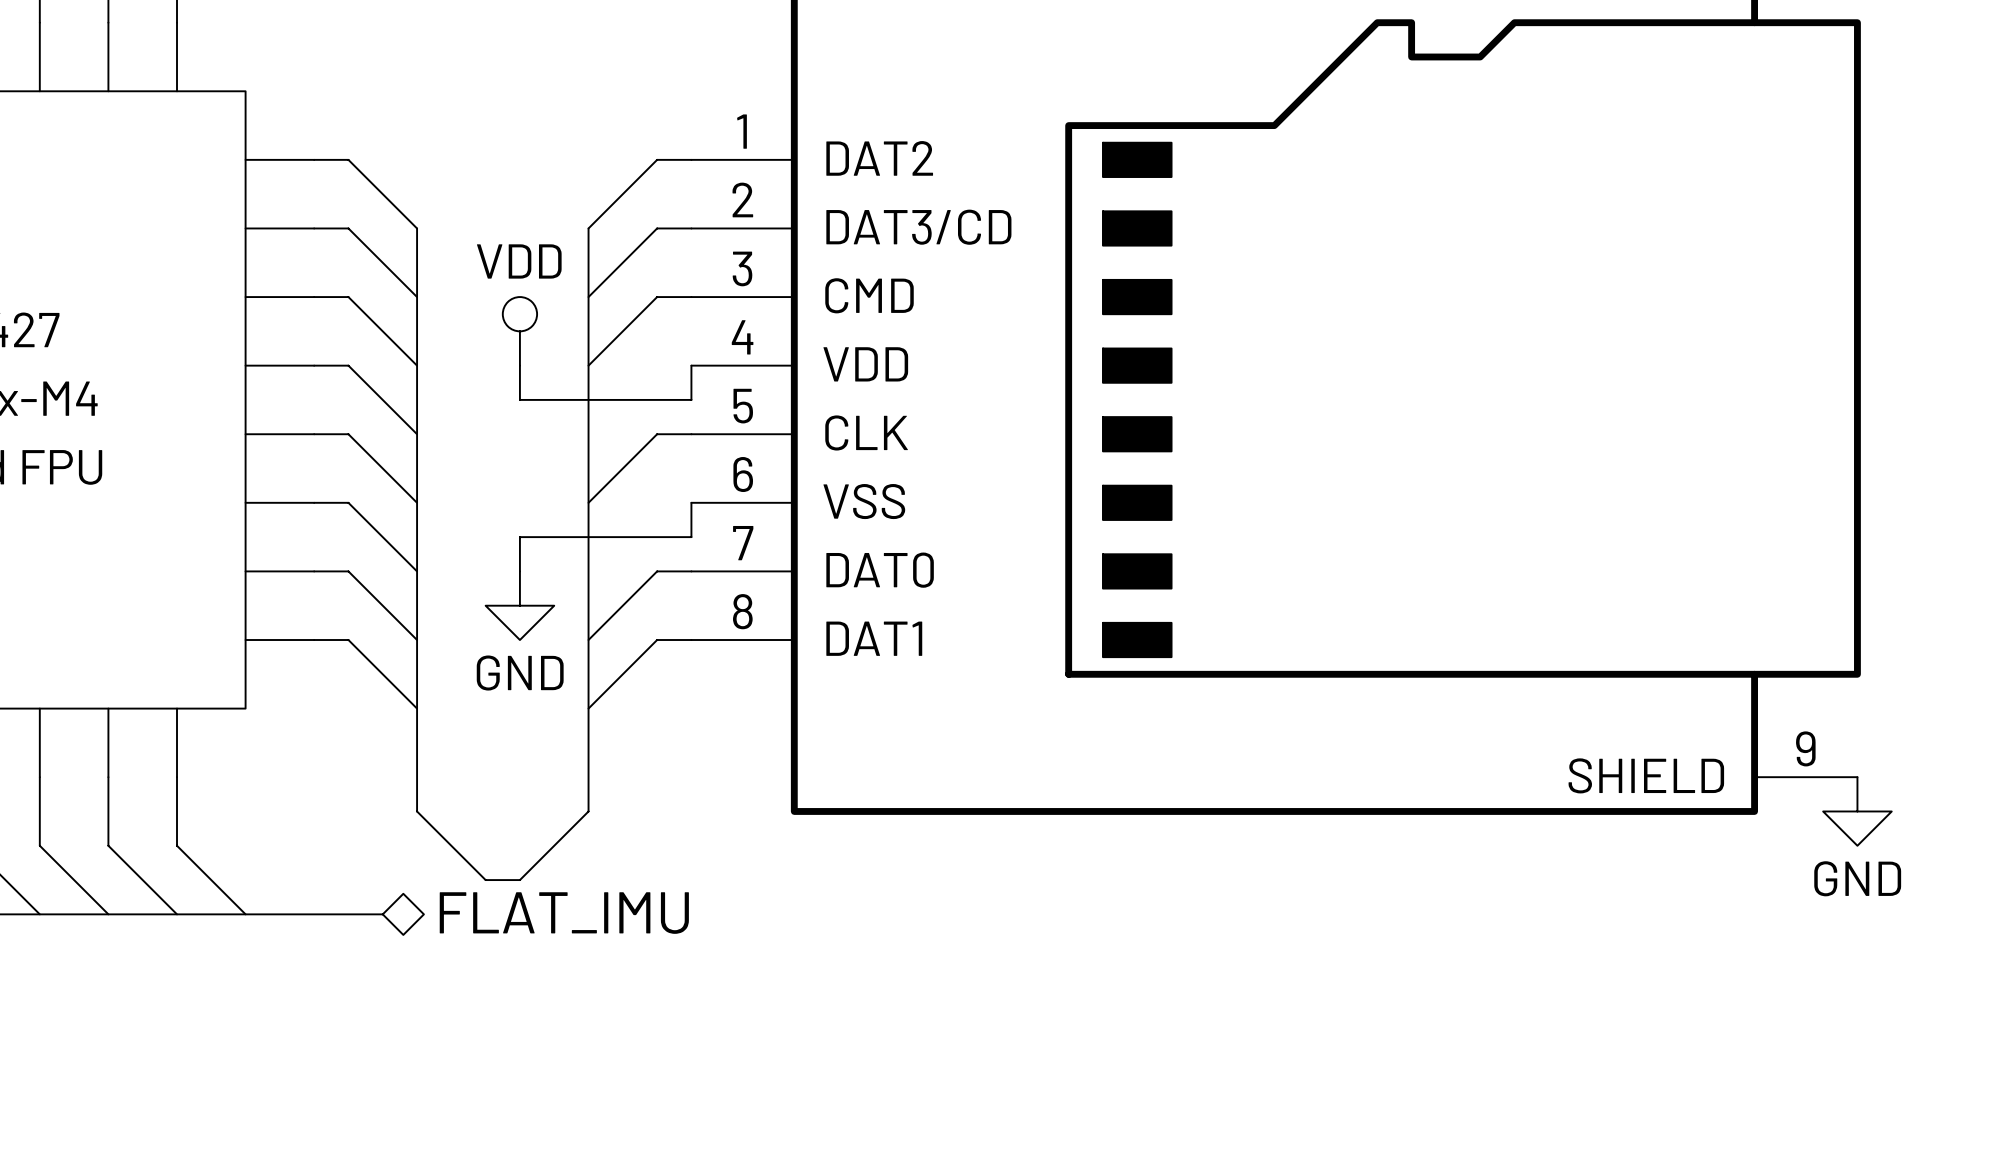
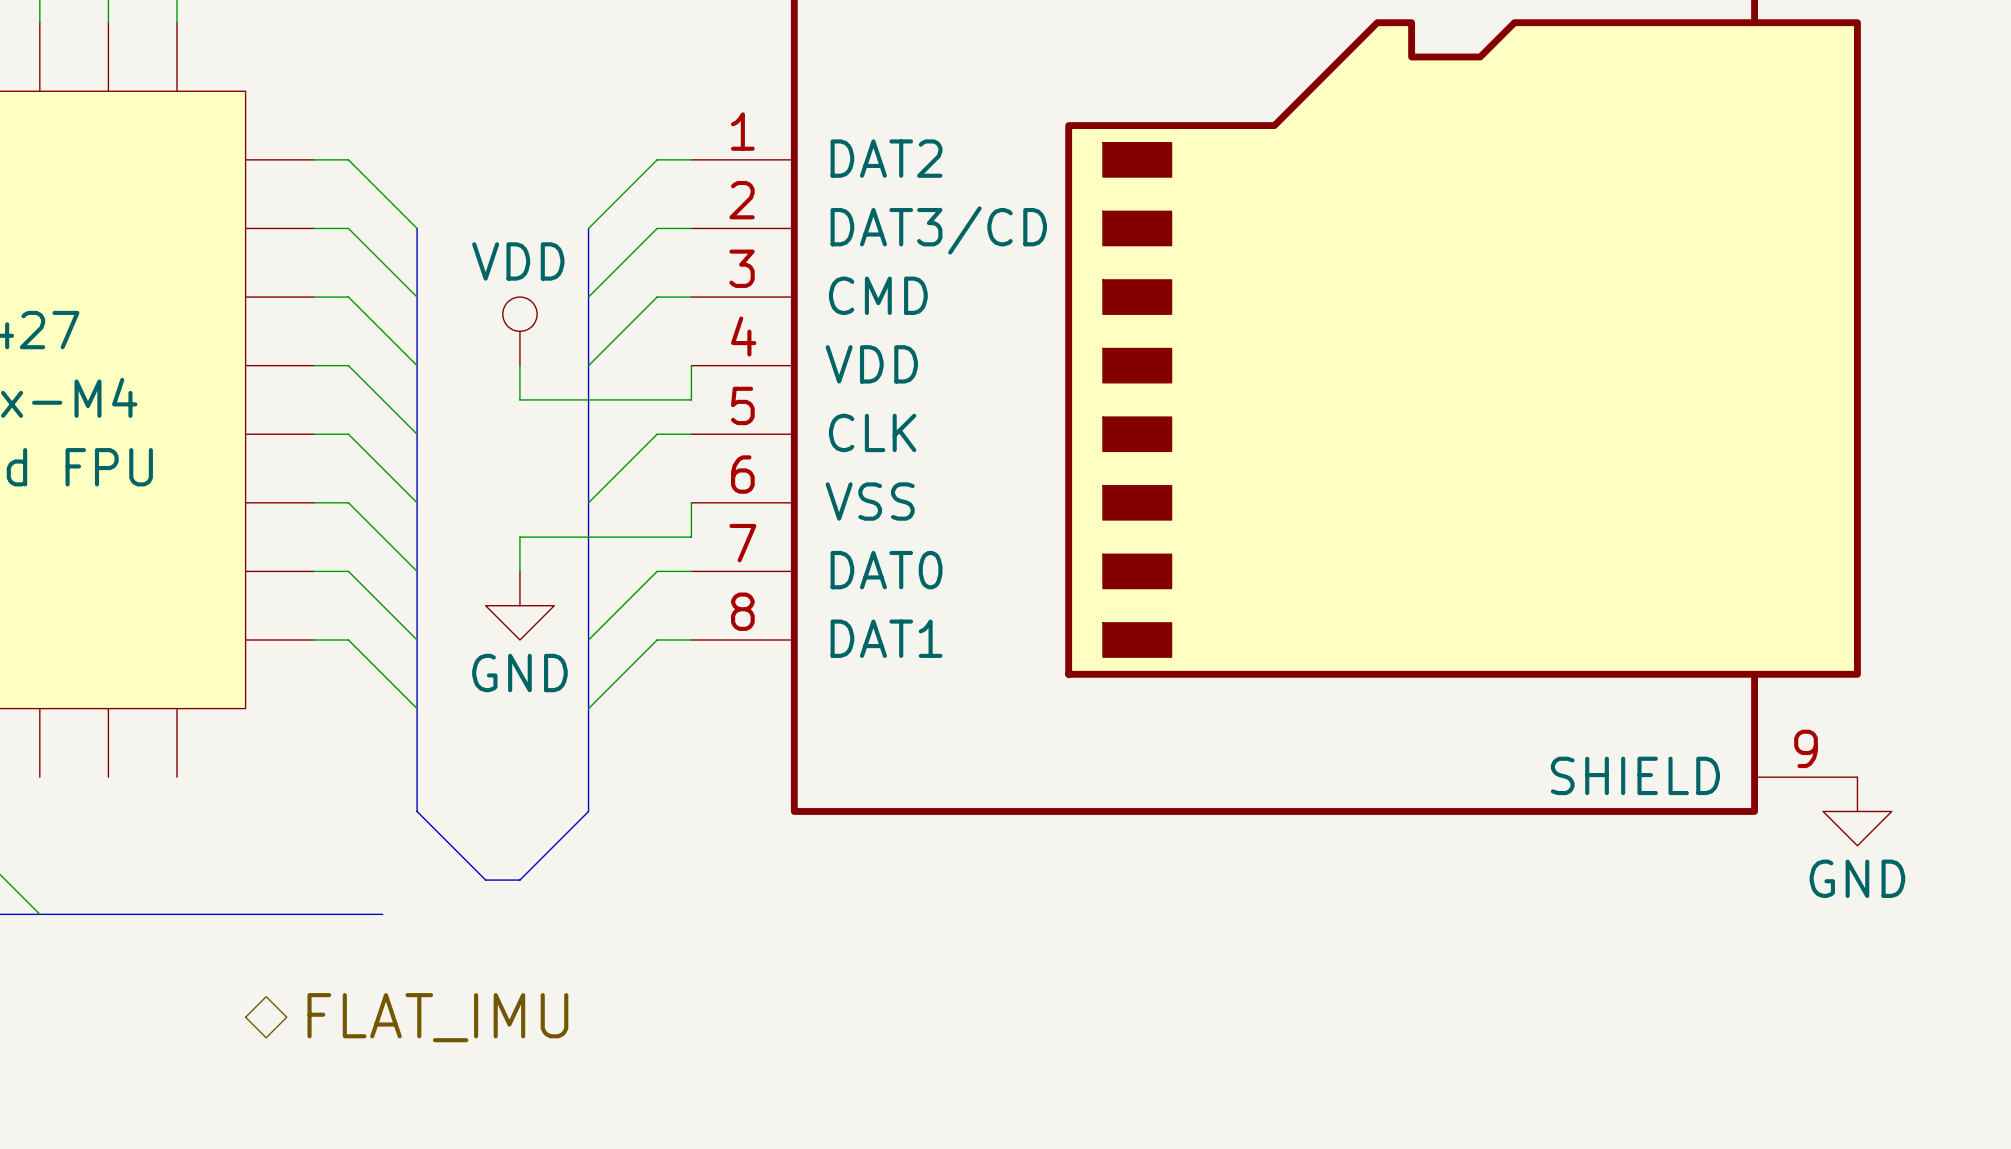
wire: (39, 777) (39, 845) (108, 914) -> none
wire: (108, 777) (108, 845) (177, 914) -> none
wire: (177, 777) (177, 845) (245, 914) -> none
hierarchical label position: FLAT_IMU (564, 913) -> FLAT_IMU (437, 1017)

